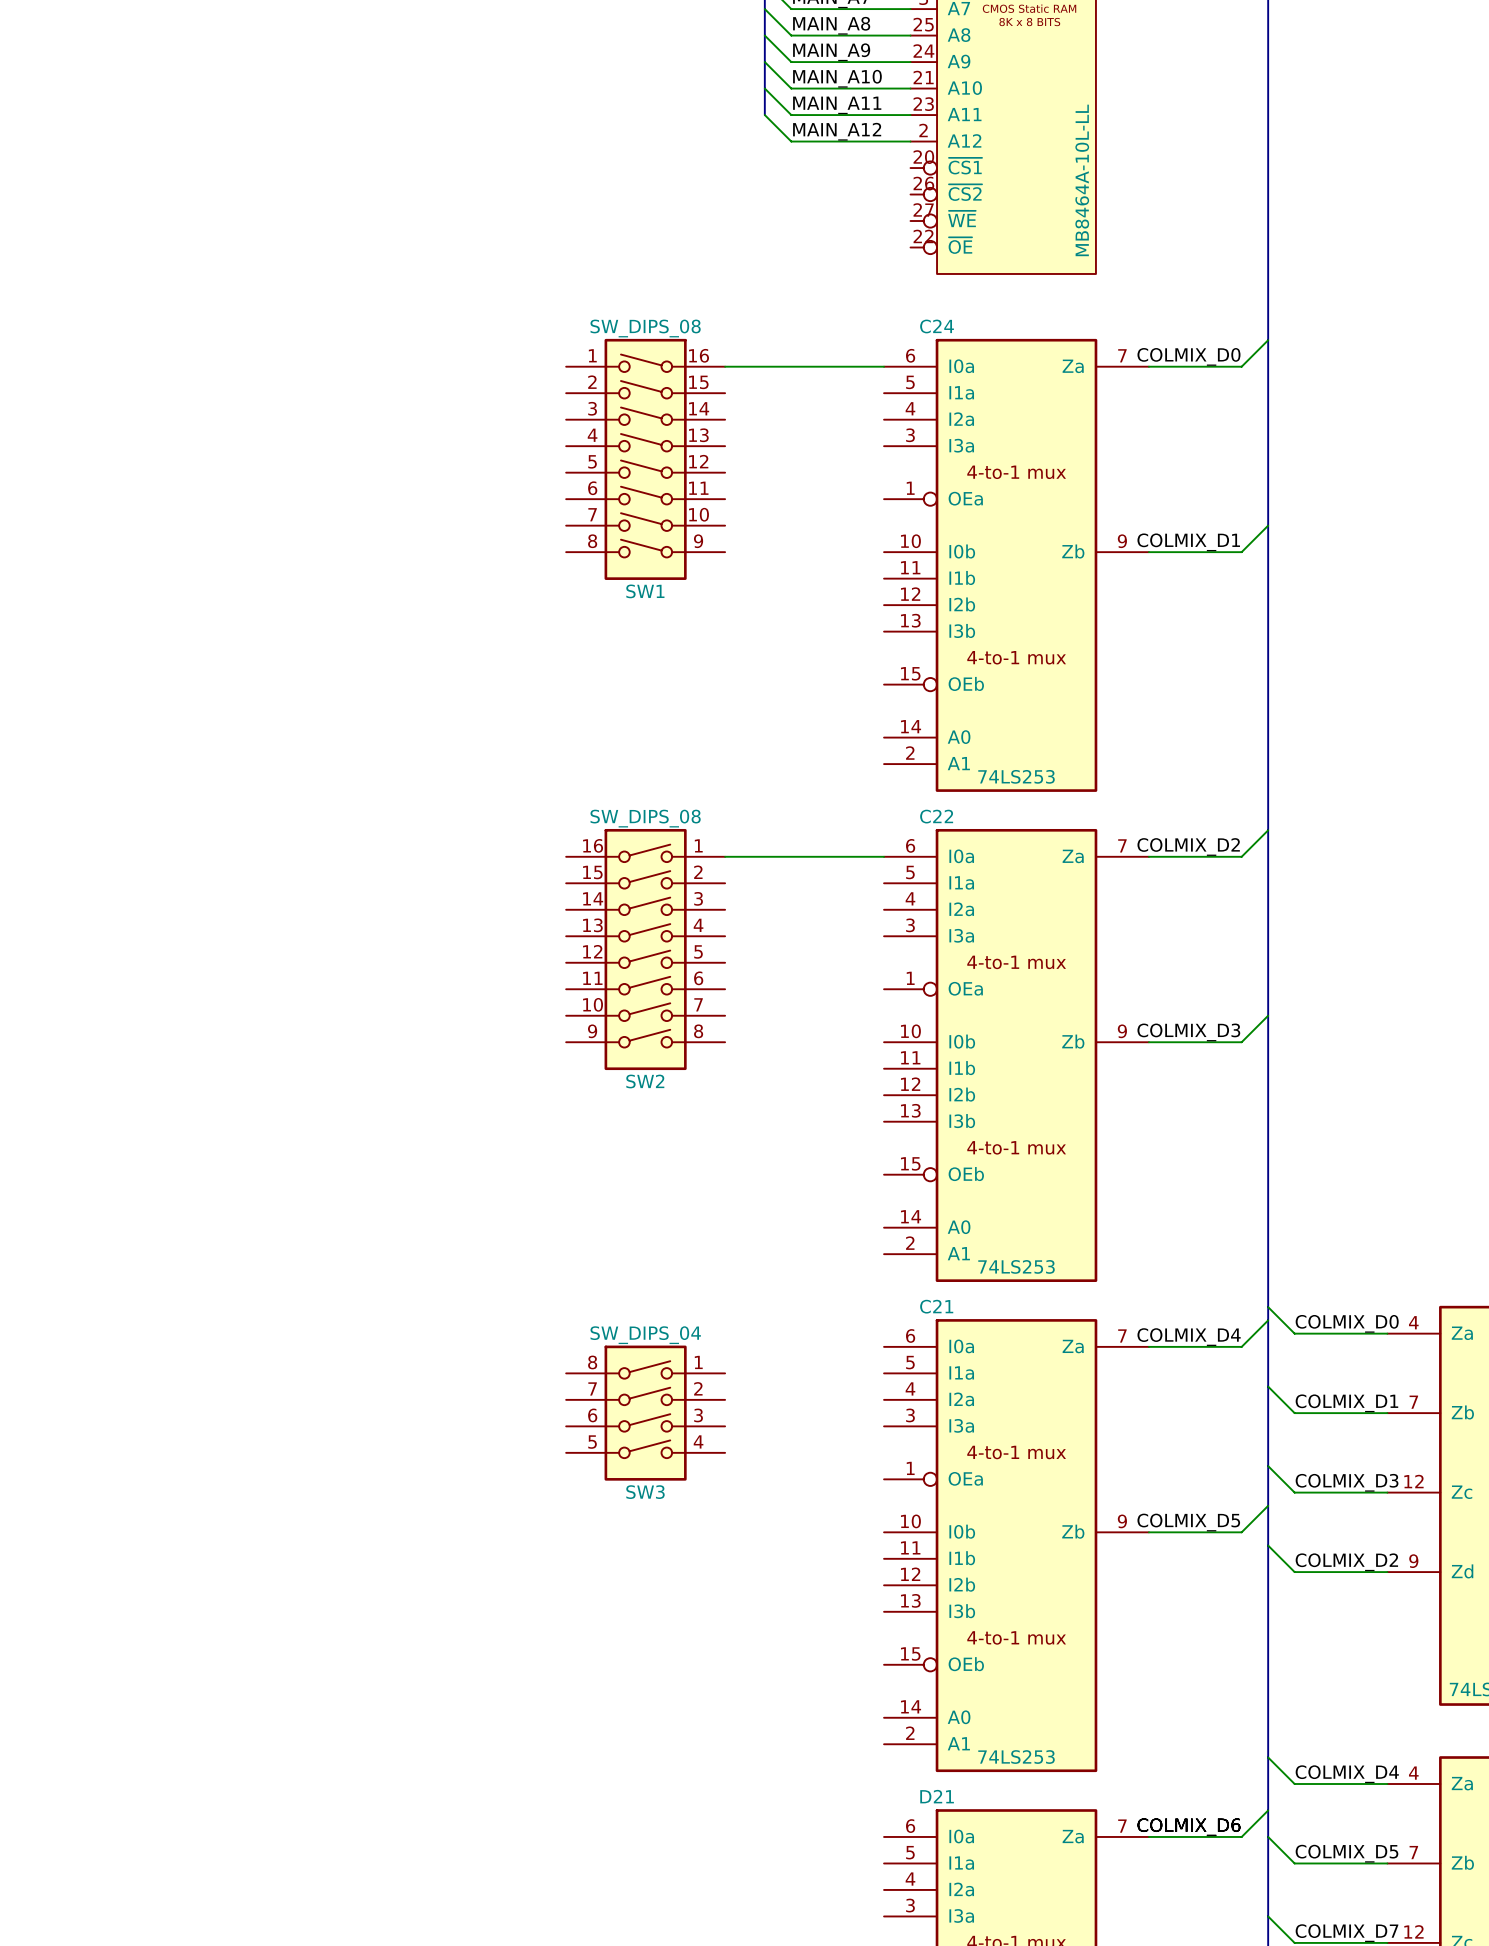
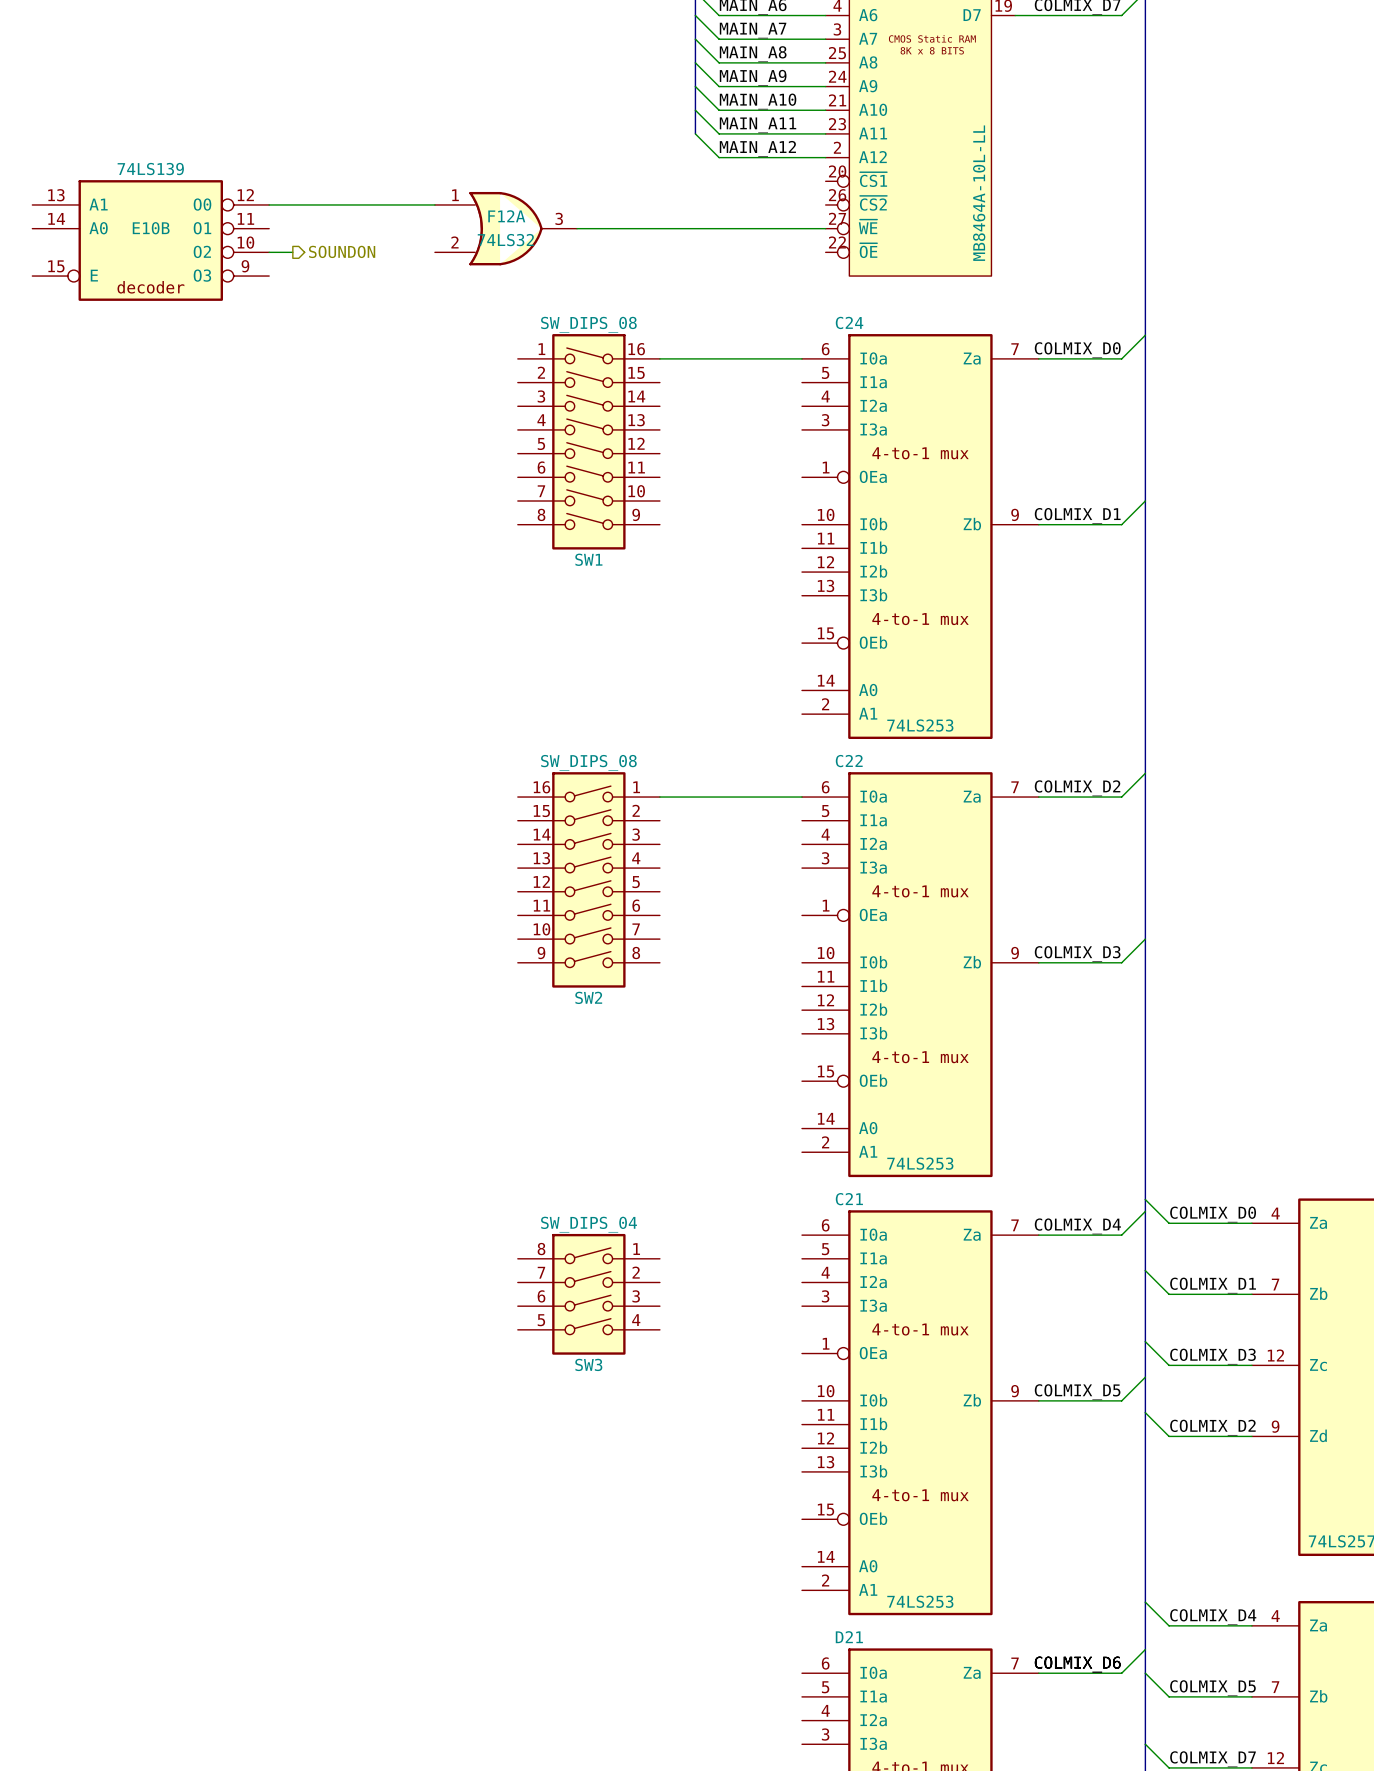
wire: none -> (269, 204) (434, 204)
F12A: none -> 74LS32 (505, 228)
wire: none -> (577, 228) (825, 228)
E10B: none -> 74LS139 (150, 240)
wire: none -> (269, 252) (292, 252)
hierarchical label: none -> SOUNDON (342, 251)

